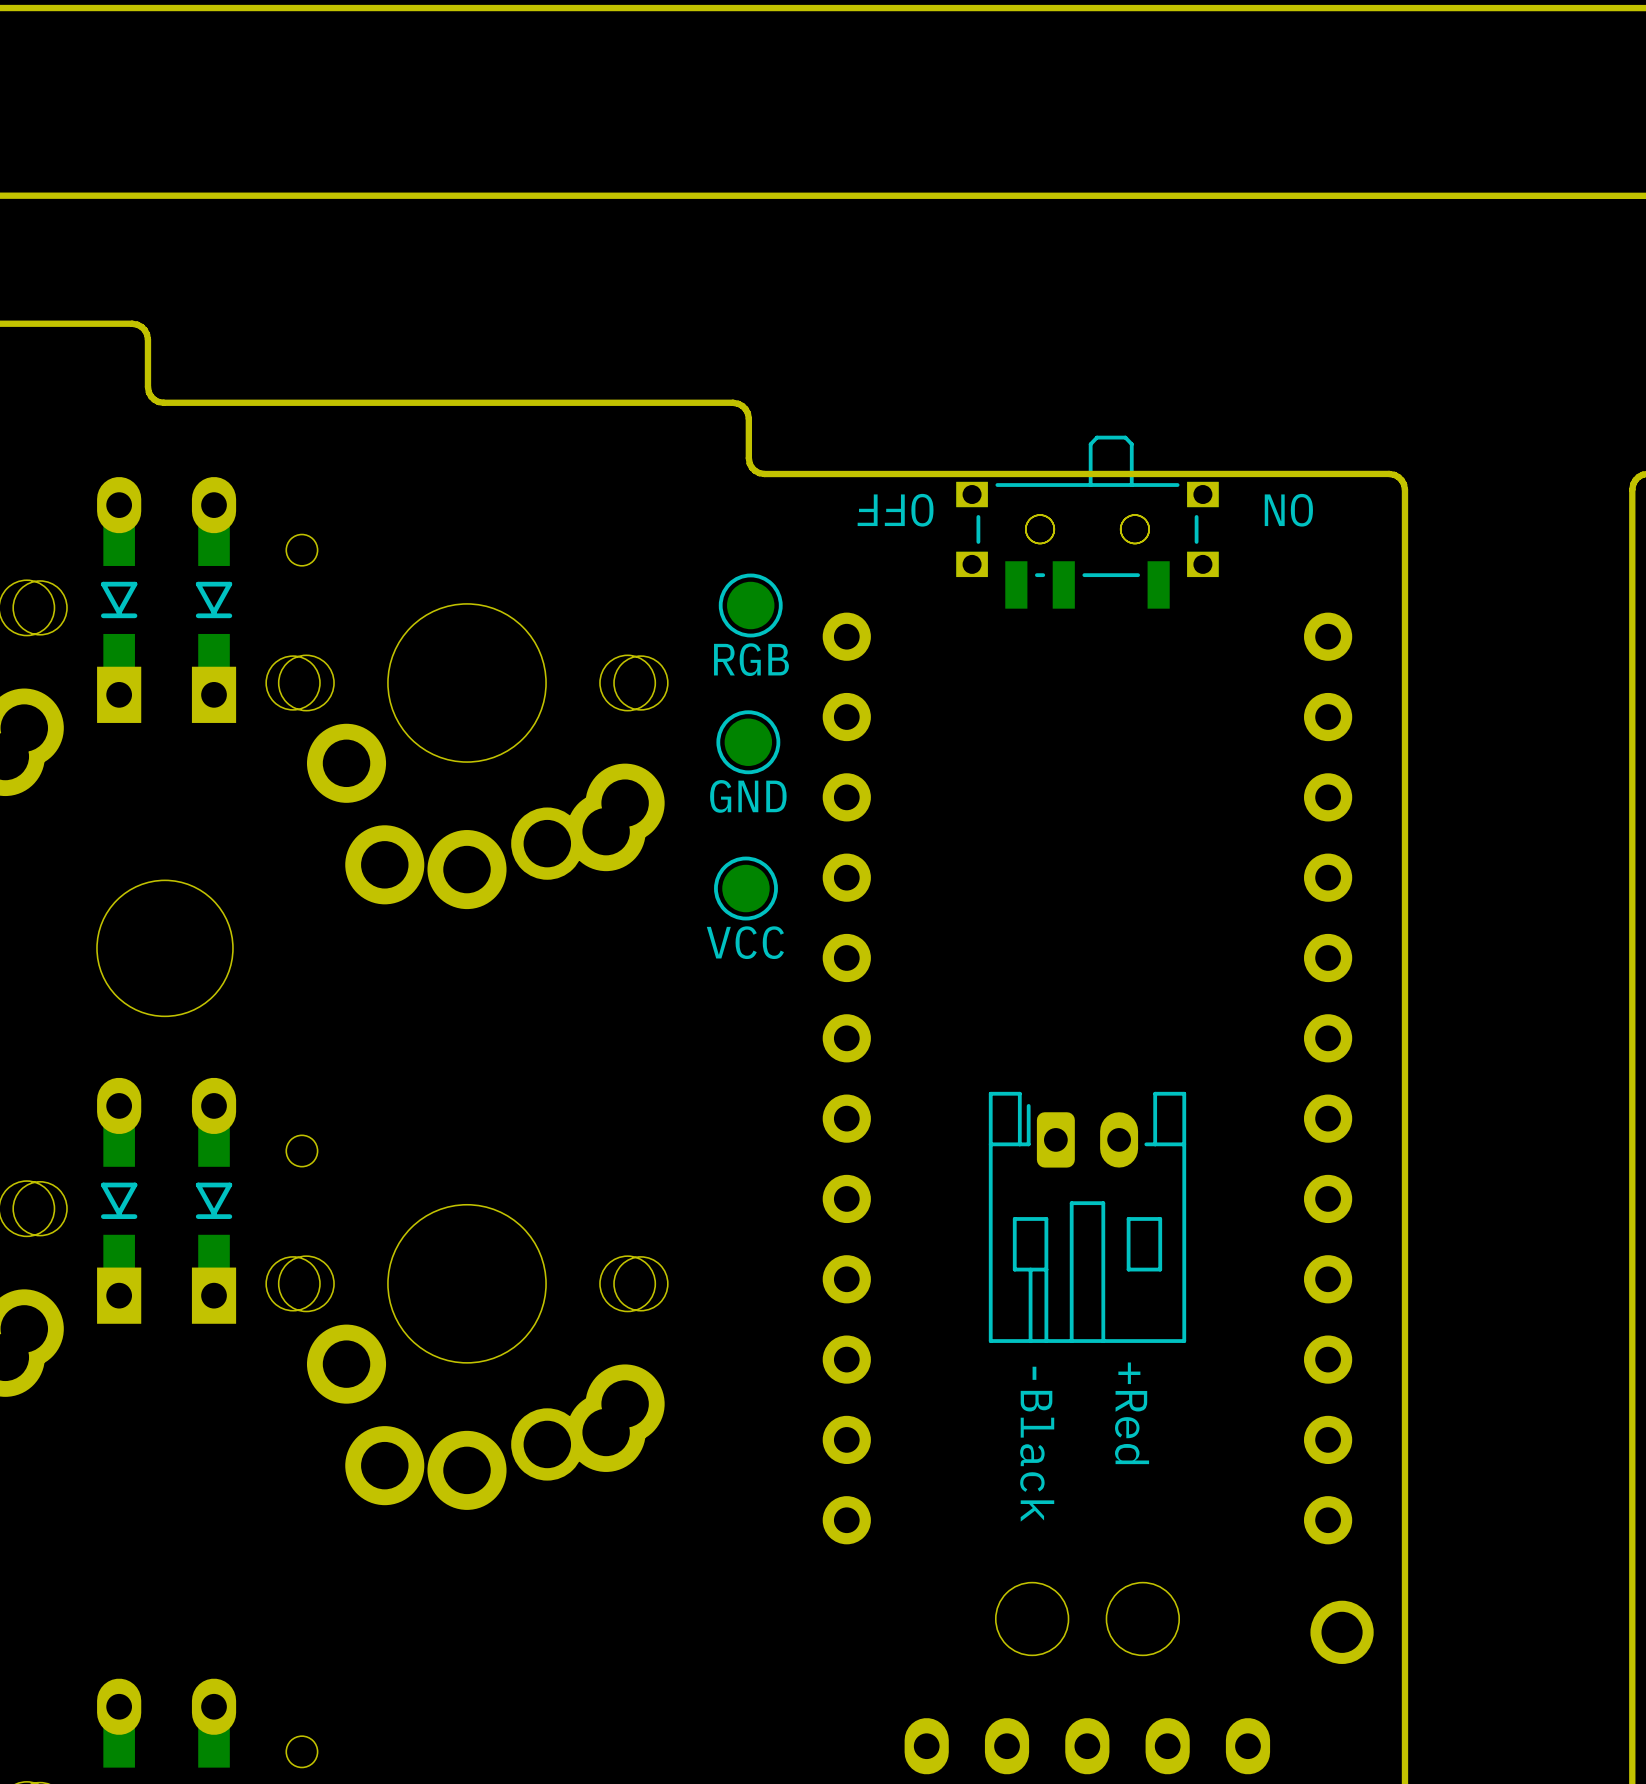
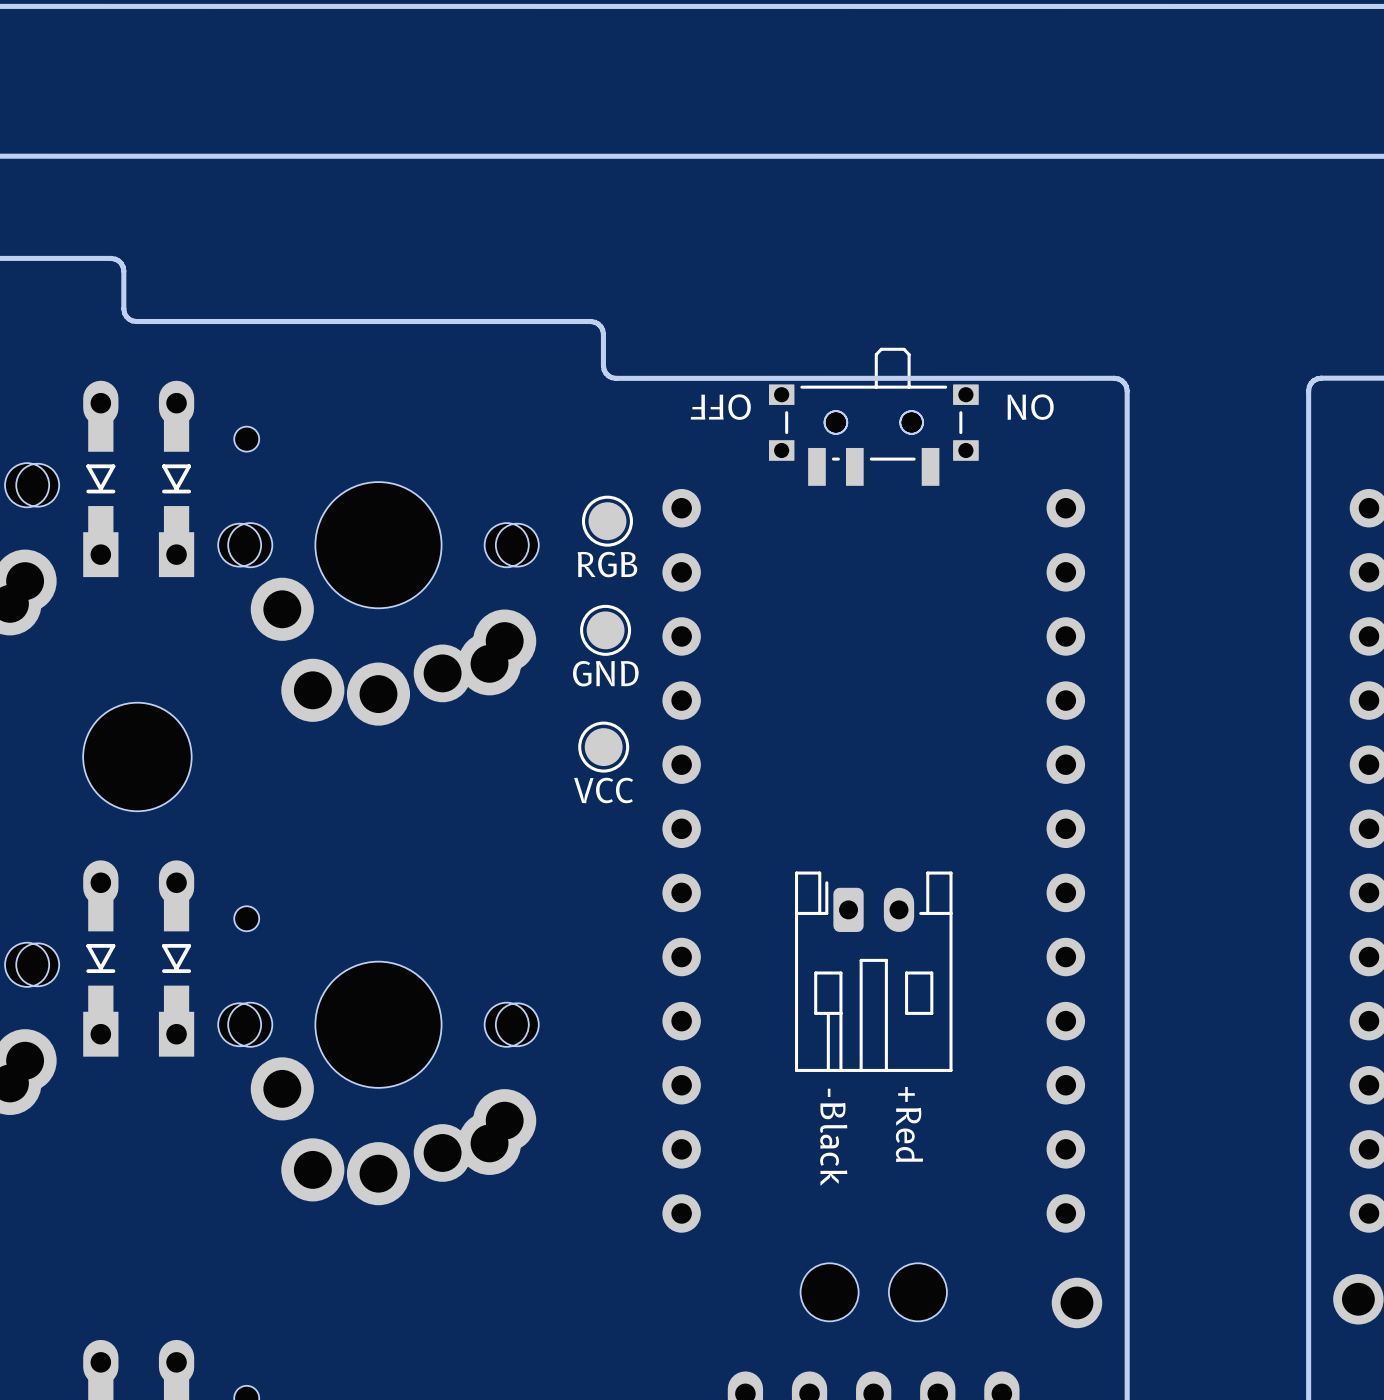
part position: (750, 605) -> (607, 521)
part position: (748, 742) -> (605, 630)
part position: (745, 888) -> (603, 747)

